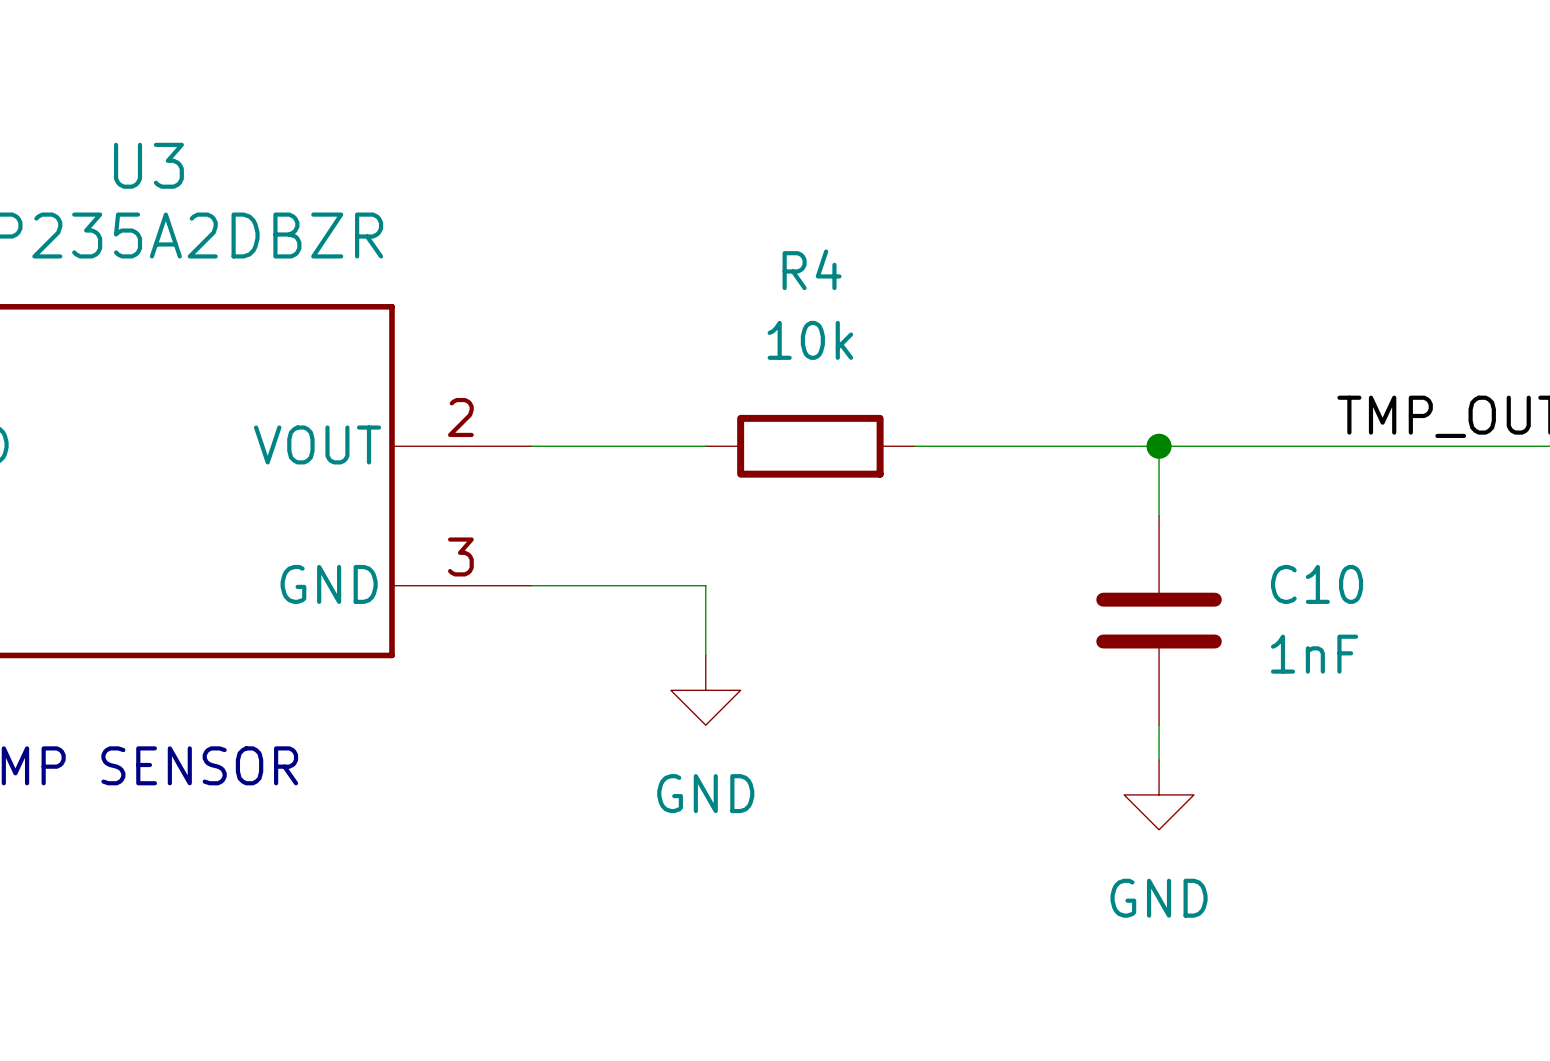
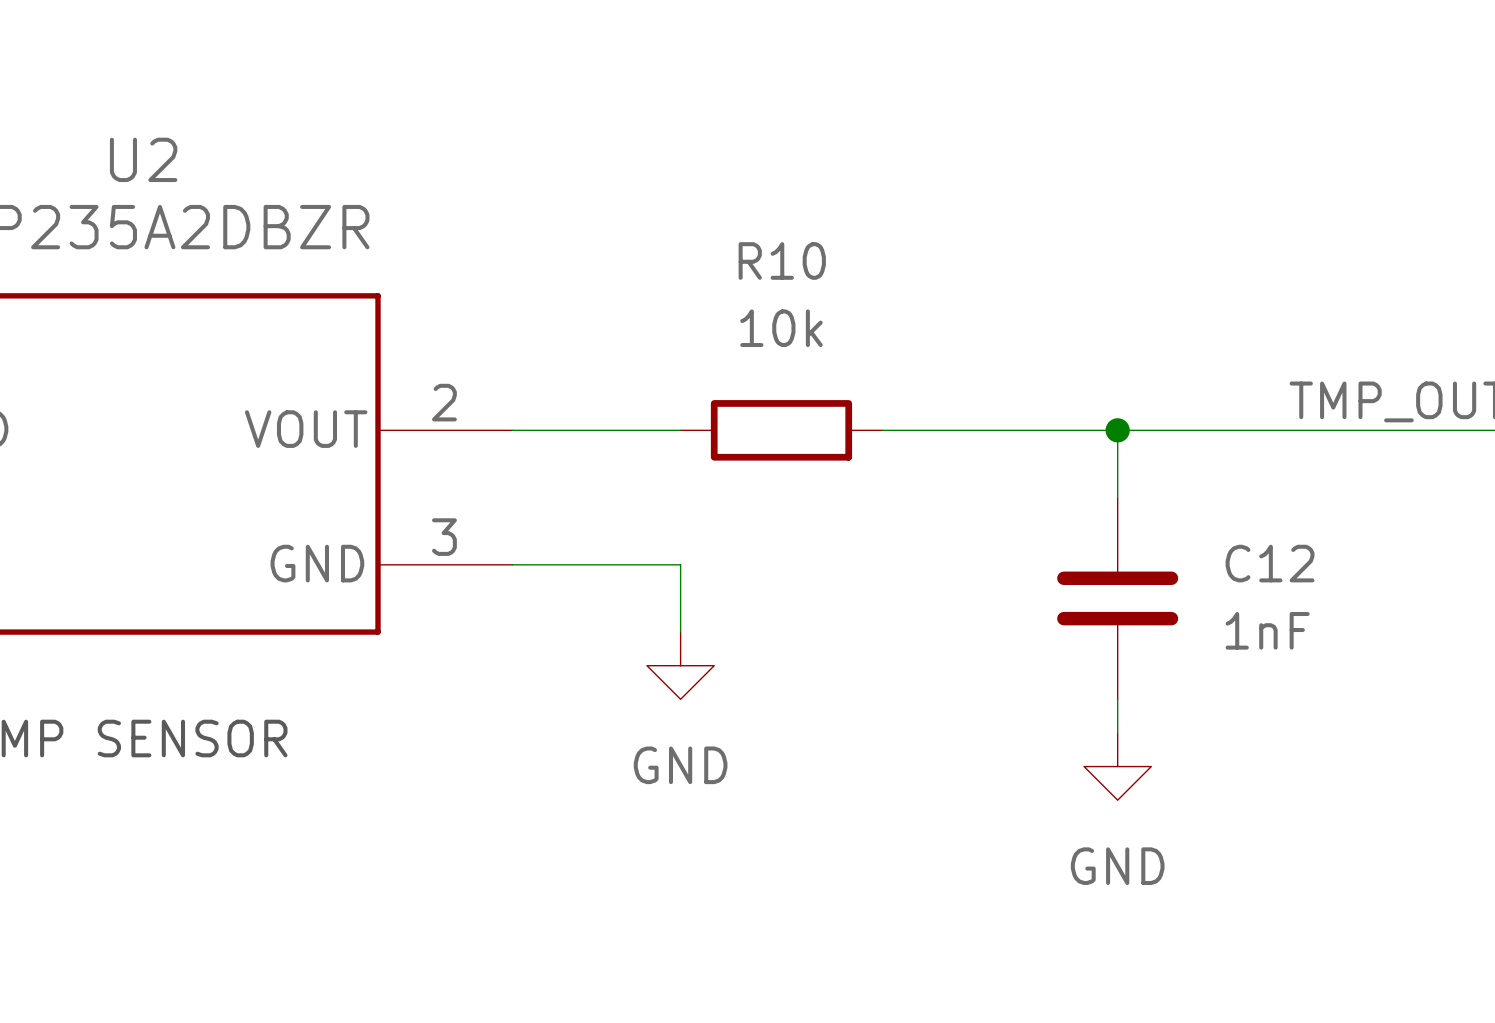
U3 name: U3 (148, 165) -> U2 (143, 159)
R4 name: R4 (812, 269) -> R10 (782, 260)
C10 name: C10 (1317, 584) -> C12 (1270, 563)

